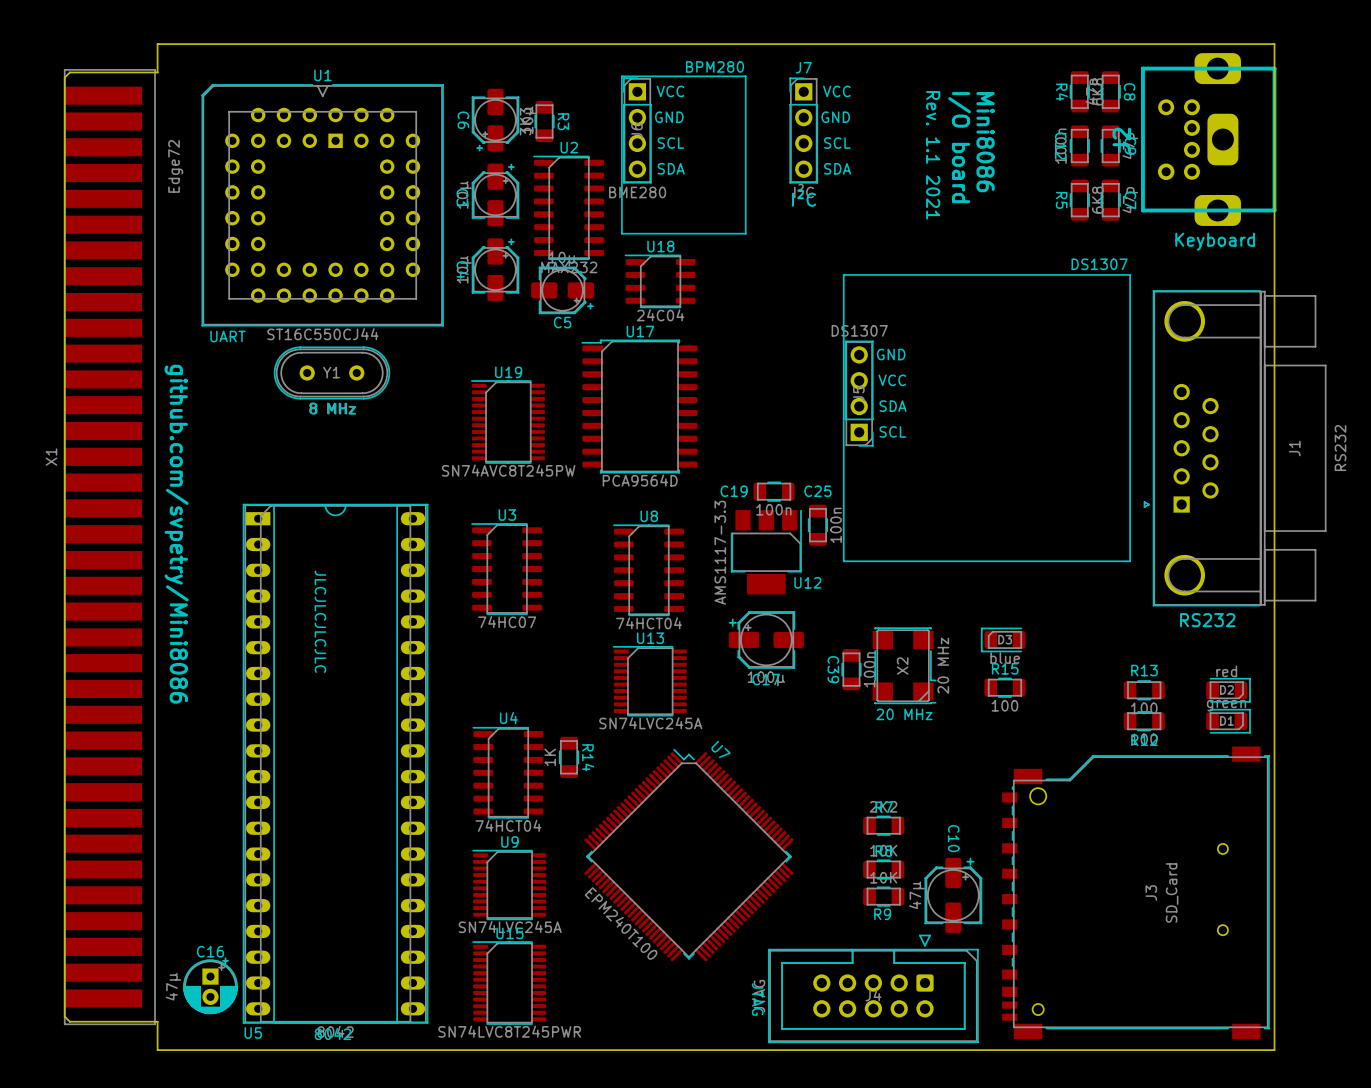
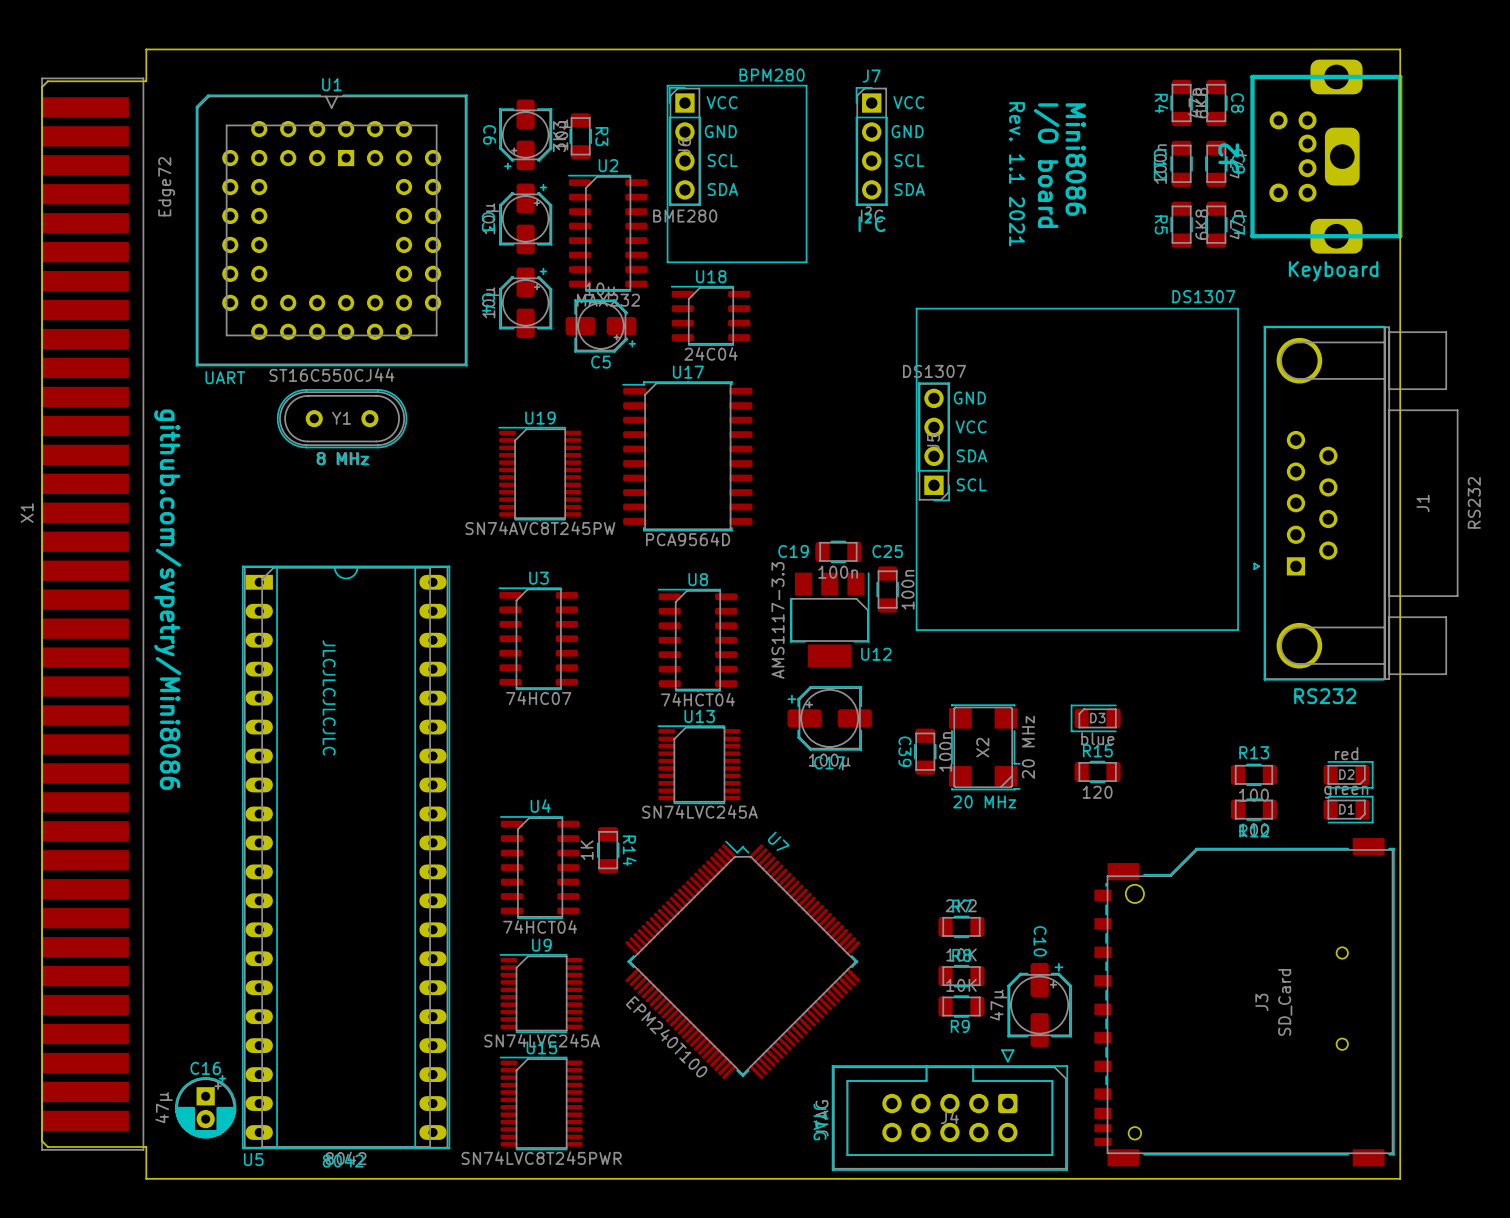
R15 value: 100 (1004, 705) -> 120 (1097, 792)

